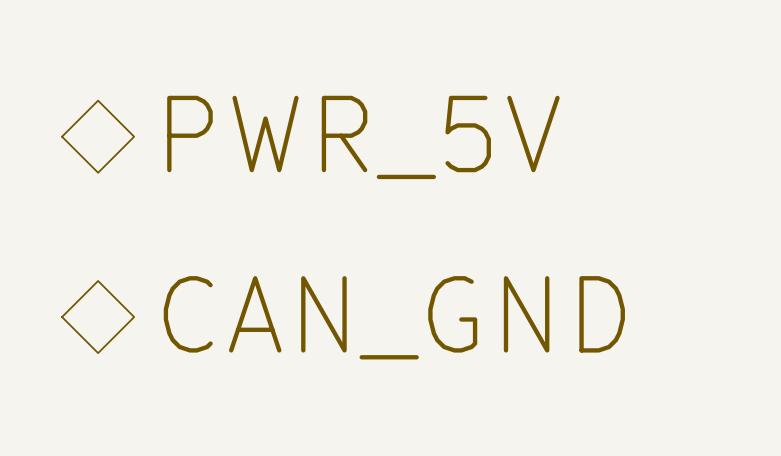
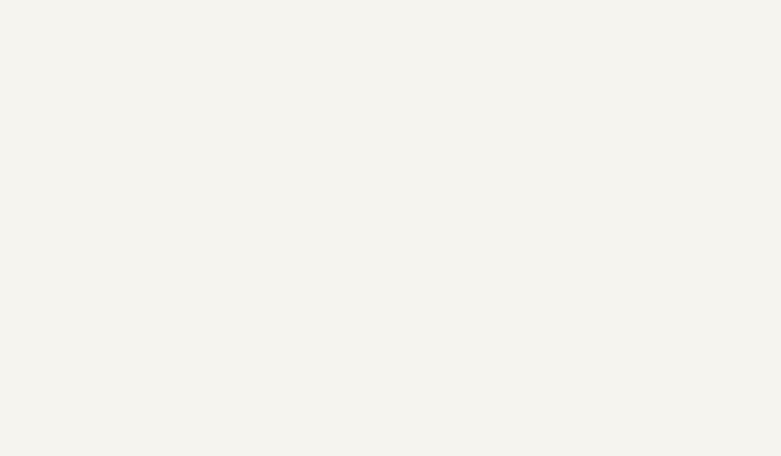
hierarchical label: PWR_5V (363, 137) -> none
hierarchical label: CAN_GND (394, 317) -> none

